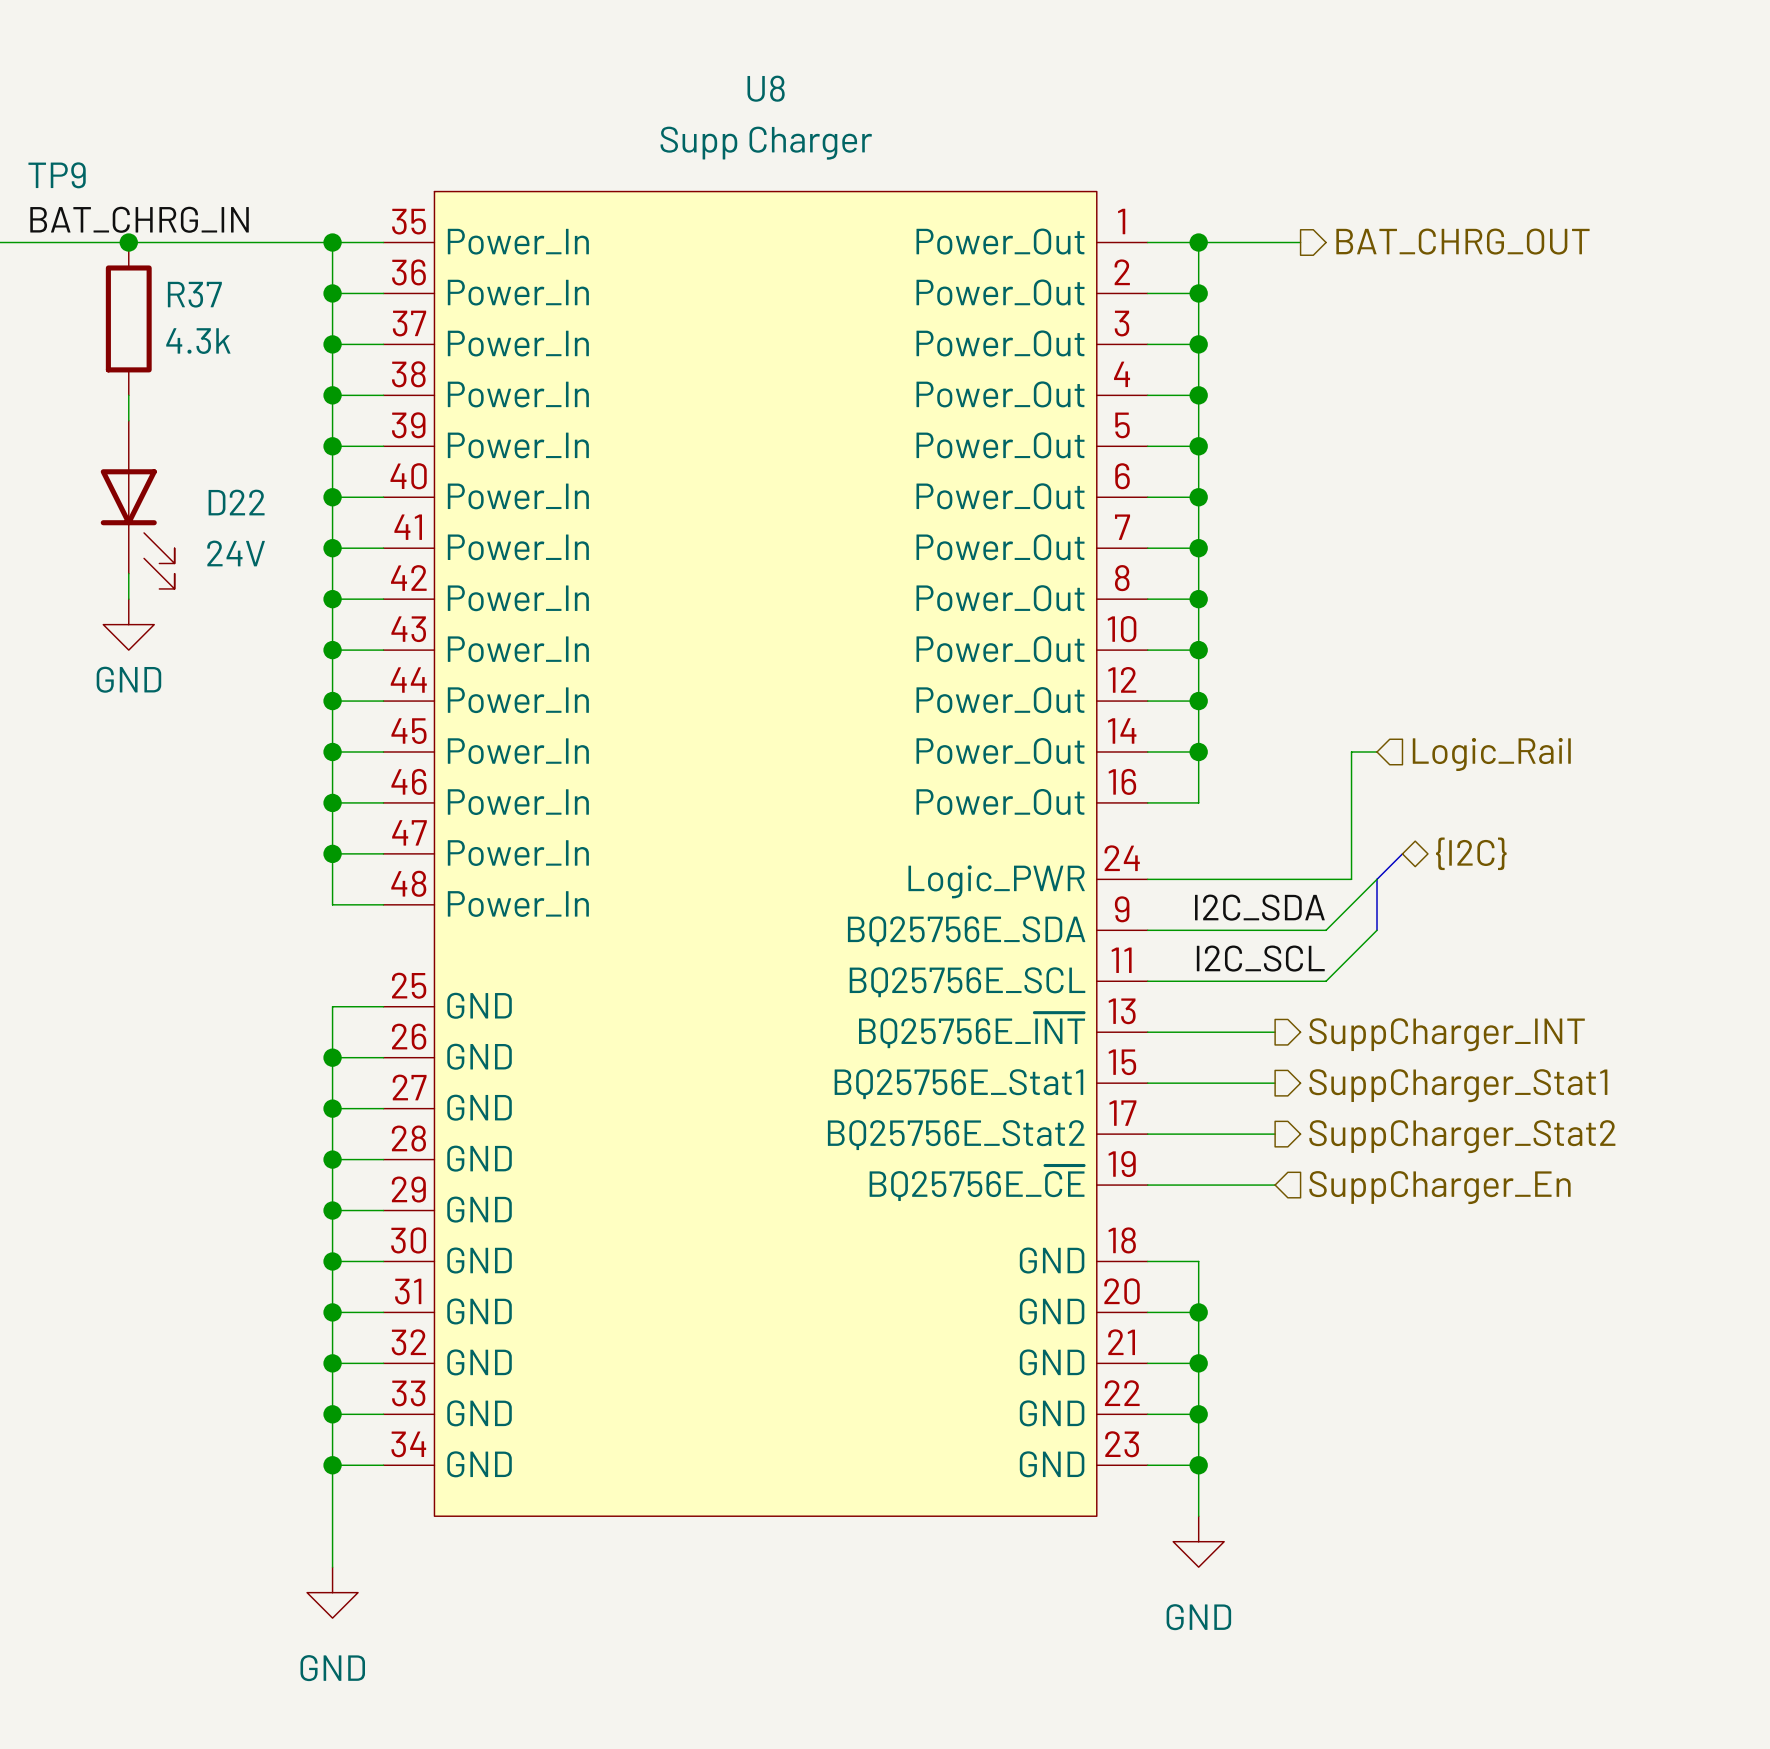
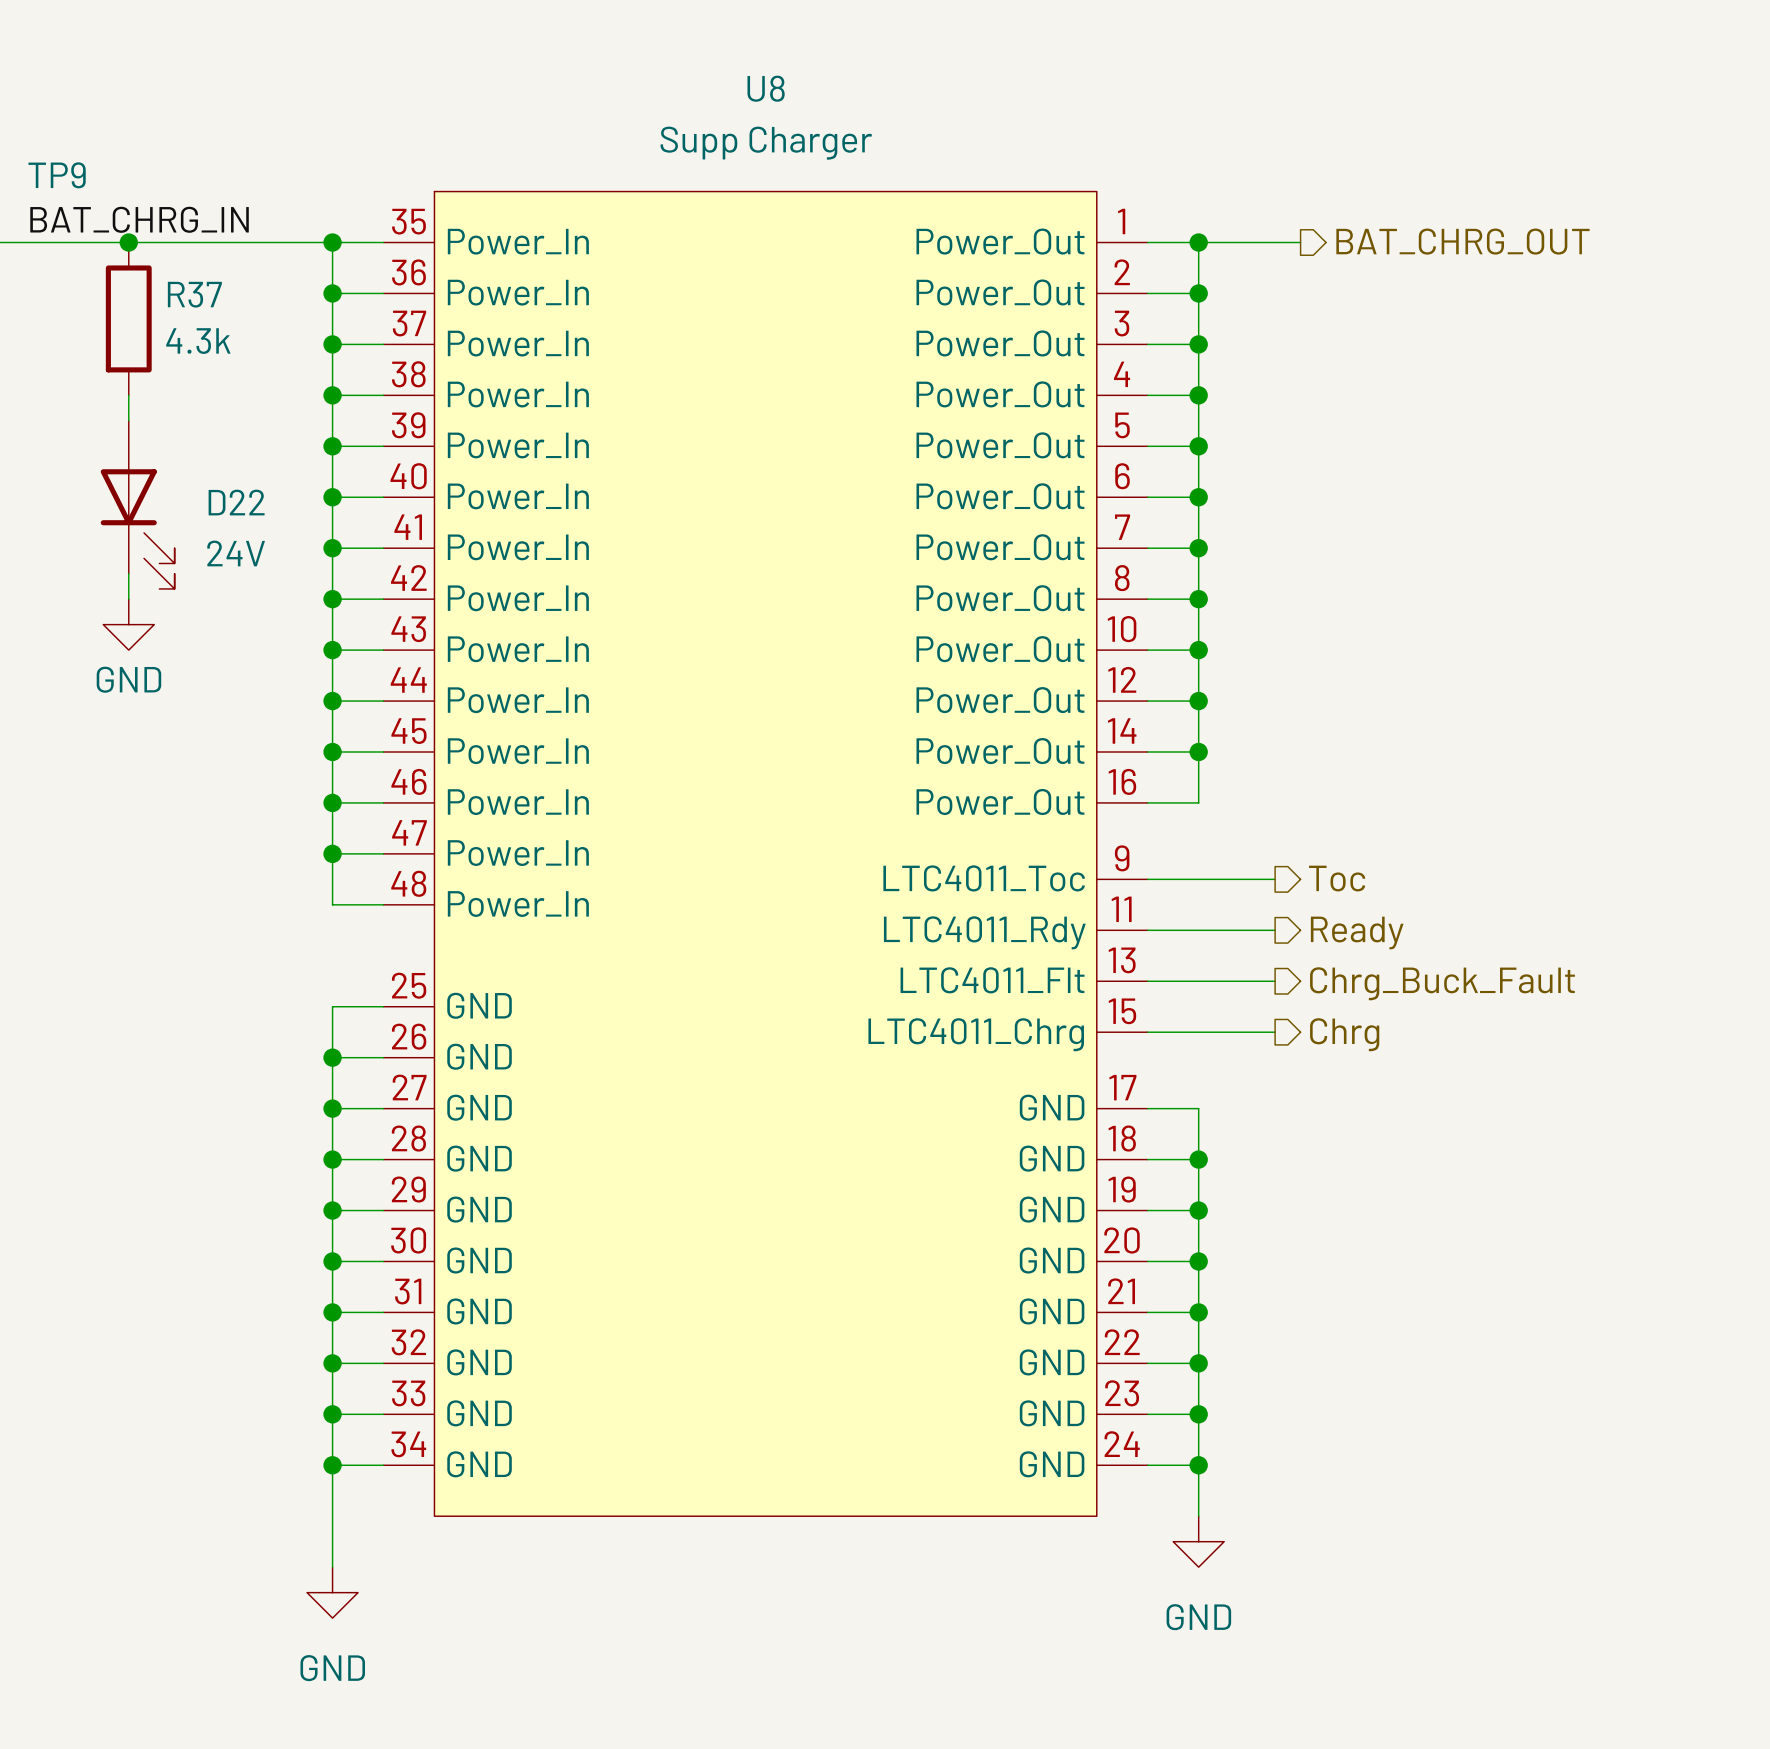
U8 symbol: [383, 191, 1148, 1517] -> [383, 191, 1148, 1517]
wire: (1377, 751) (1351, 751) (1351, 879) (1275, 879) -> none
hierarchical label: Logic_Rail (1491, 754) -> none
bus: (1402, 853) (1377, 879) (1377, 930) -> none
hierarchical label: {I2C} (1471, 853) -> none
hierarchical label: none -> Toc (1337, 878)
wire: (1377, 879) (1326, 930) (1275, 930) -> none
label: I2C_SDA (1259, 907) -> none
wire: (1377, 930) (1326, 981) (1275, 981) -> none
hierarchical label: none -> Ready (1357, 933)
label: I2C_SCL (1260, 958) -> none
hierarchical label: none -> Chrg_Buck_Fault (1442, 983)
hierarchical label: SuppCharger_INT (1447, 1034) -> Chrg (1344, 1034)
wire: (1147, 1083) (1275, 1083) -> none
hierarchical label: SuppCharger_Stat1 (1458, 1085) -> none
wire: none -> (1147, 1108) (1198, 1108) (1198, 1261)
wire: (1147, 1134) (1275, 1134) -> none
hierarchical label: SuppCharger_Stat2 (1462, 1136) -> none
wire: none -> (1147, 1159) (1198, 1159)
junction: none -> (1198, 1159)
wire: (1147, 1185) (1275, 1185) -> none
hierarchical label: SuppCharger_En (1439, 1187) -> none
wire: none -> (1147, 1210) (1198, 1210)
junction: none -> (1198, 1210)
junction: none -> (1198, 1261)

